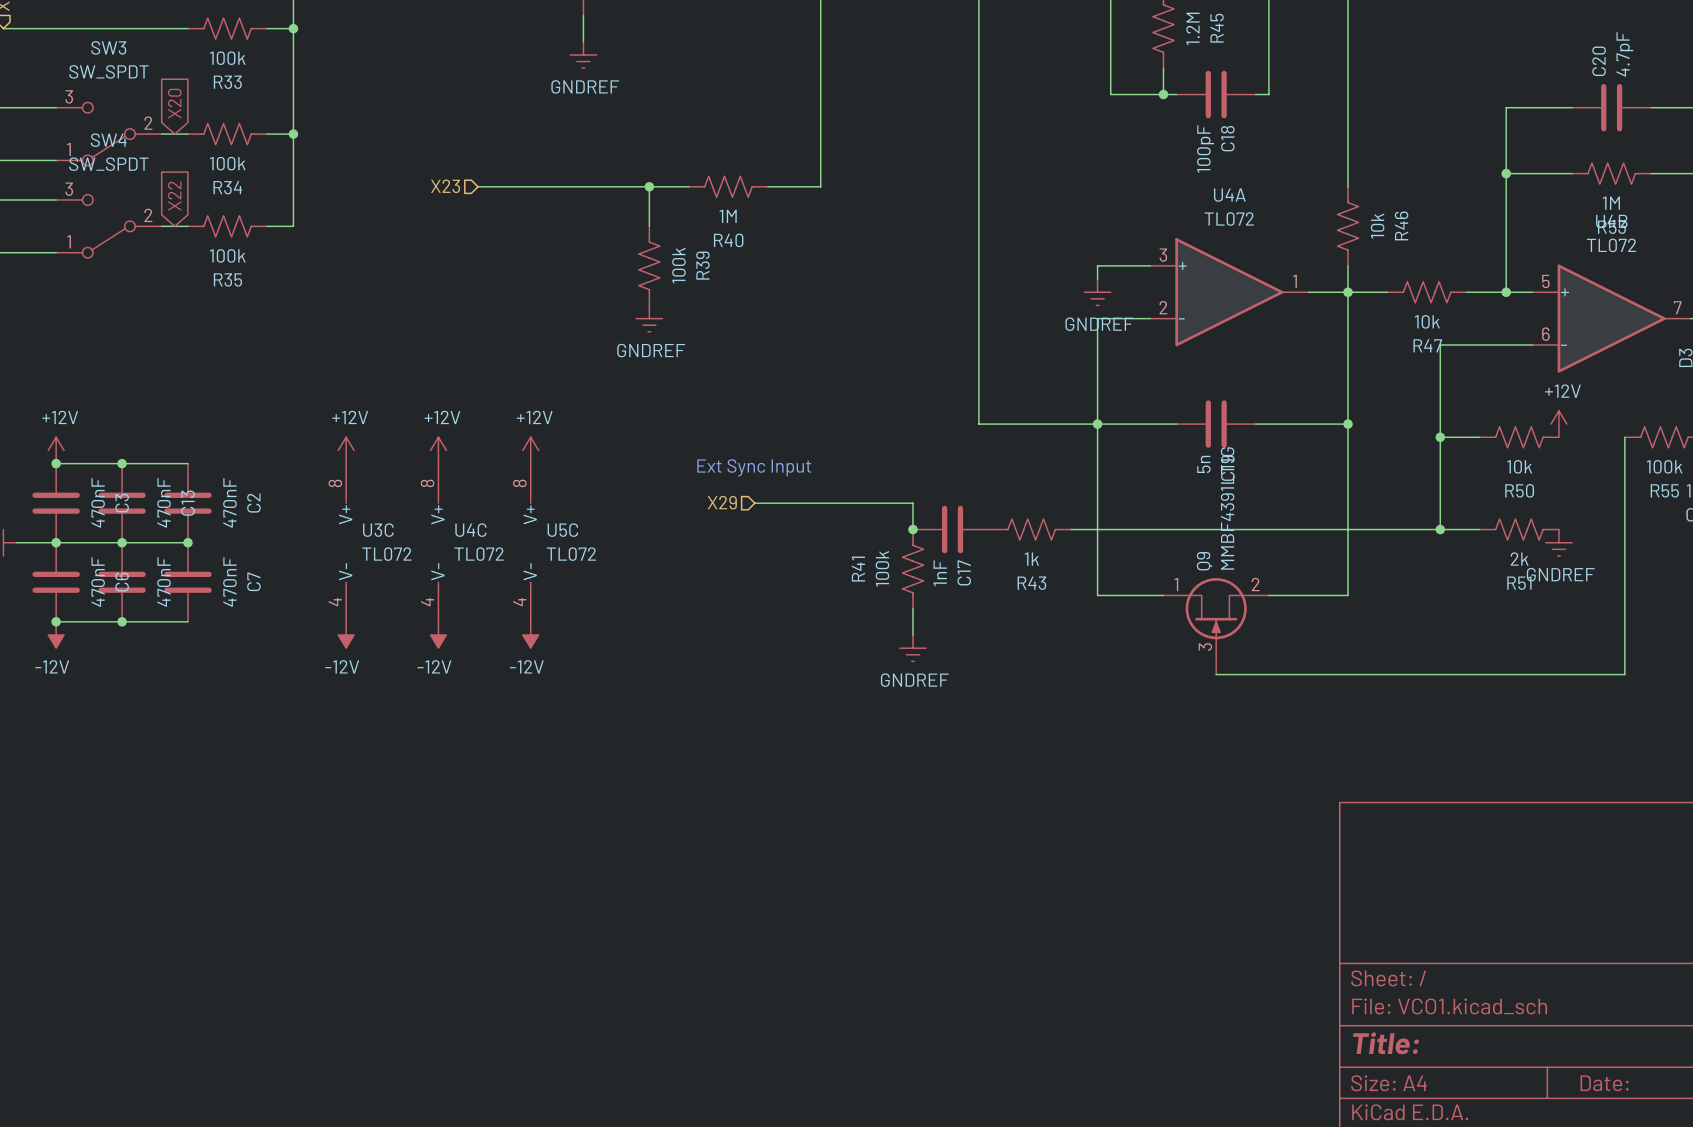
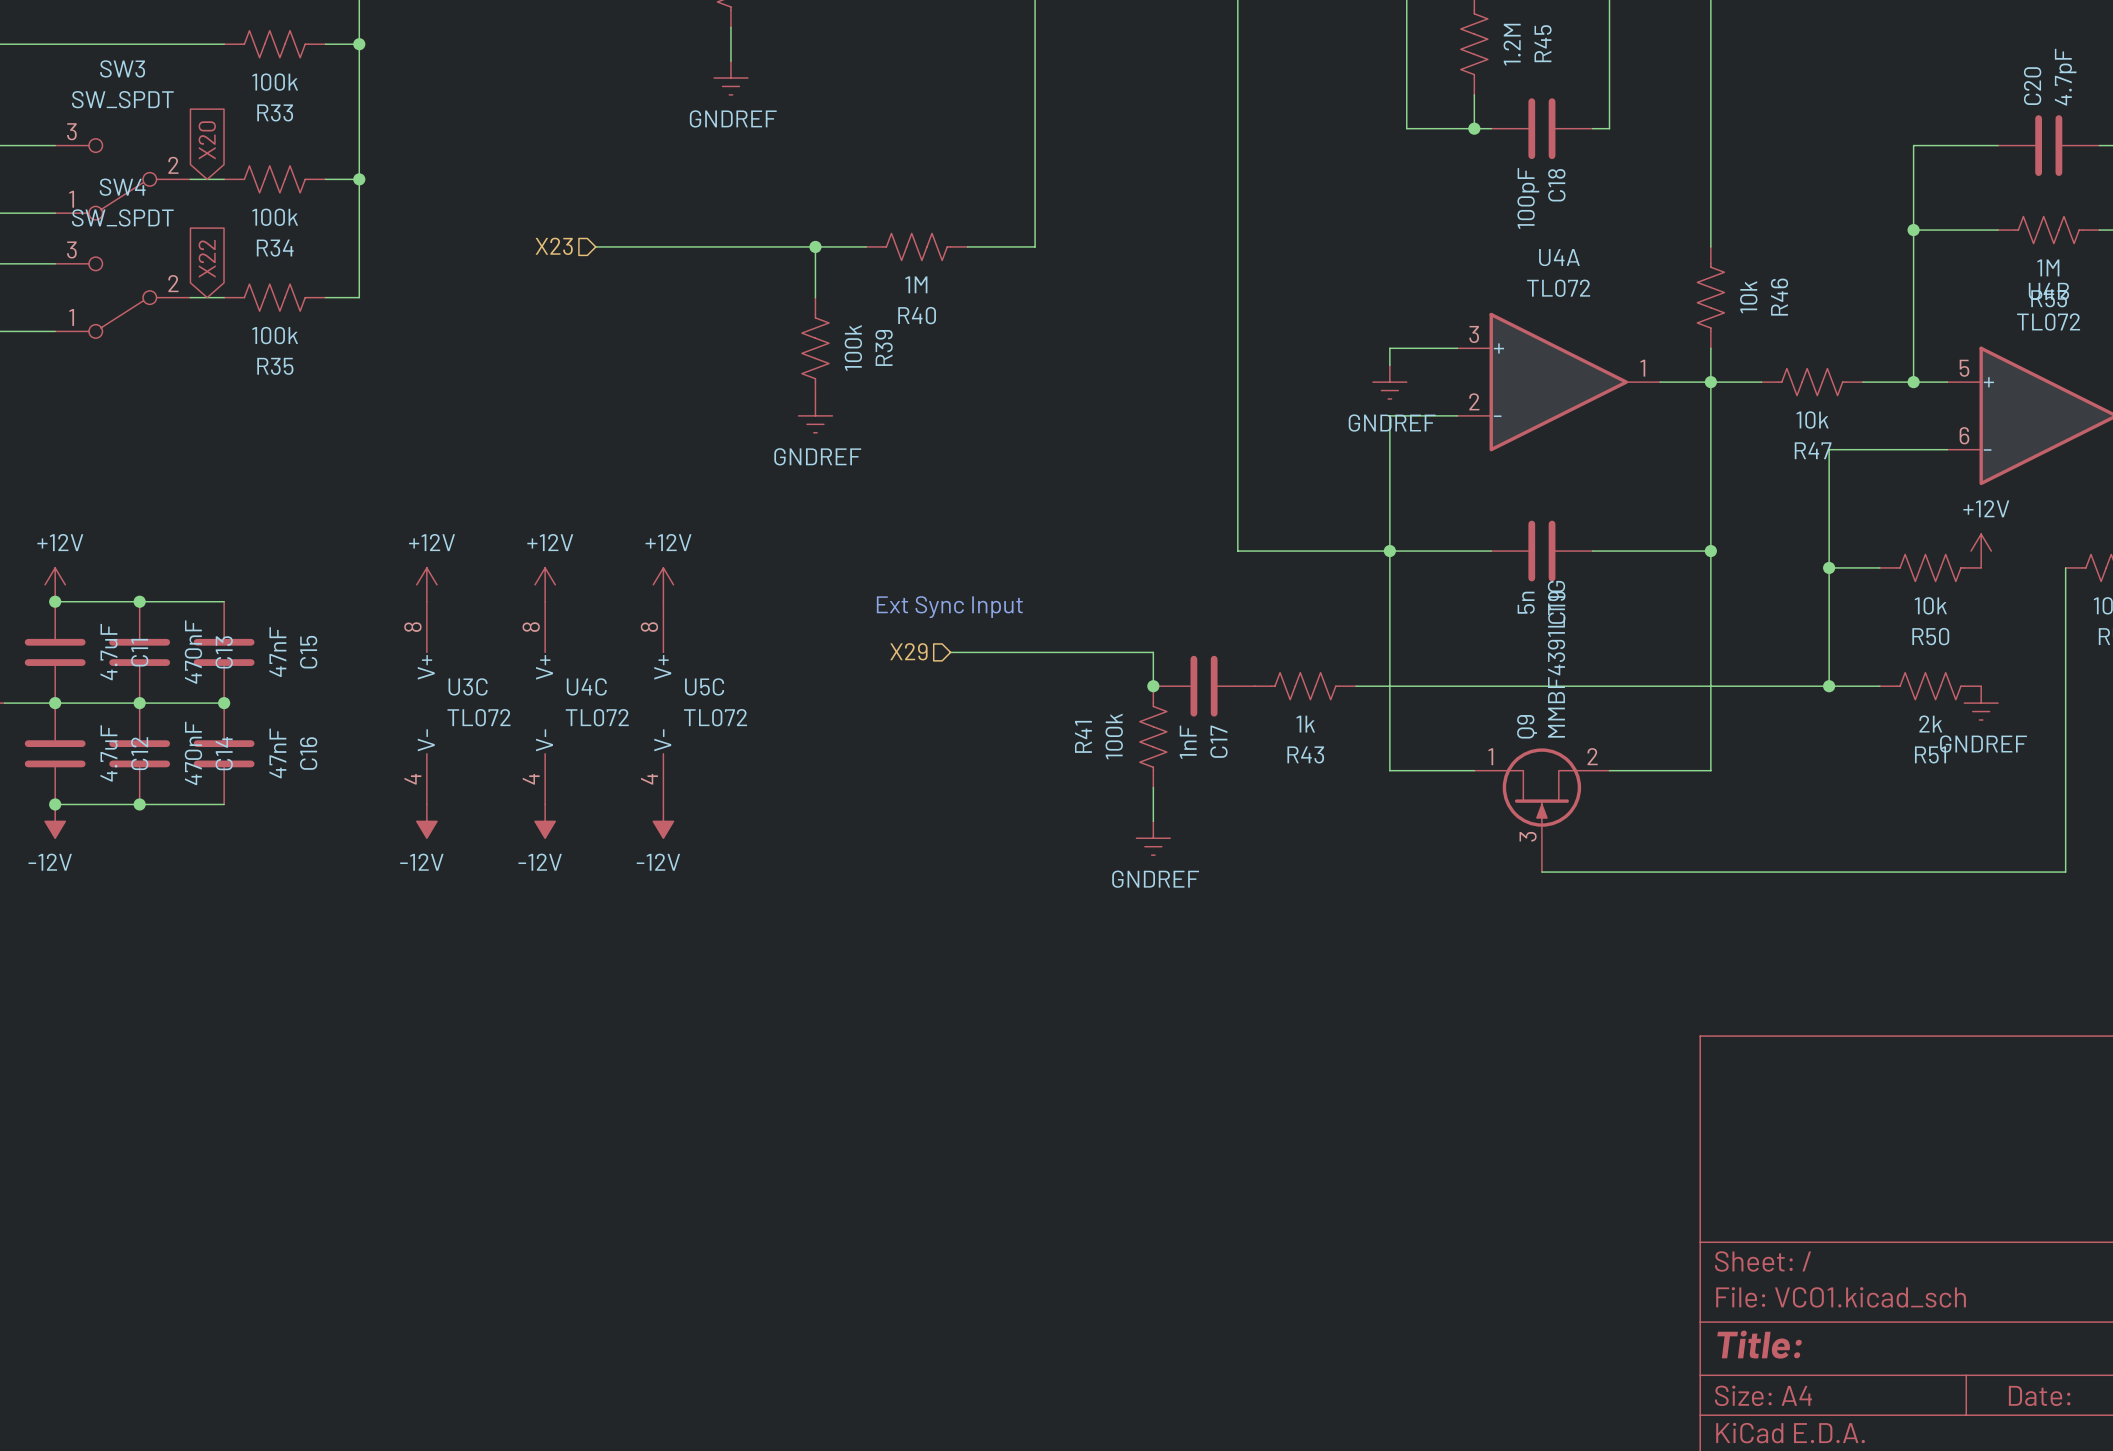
C3 value: 470nF (98, 502) -> 4.7uF (109, 652)
C2 value: 470nF (229, 502) -> 47nF (277, 652)
C3 name: C3 (122, 503) -> C11 (139, 652)
C2 name: C2 (253, 503) -> C15 (308, 652)
C7 name: C7 (253, 581) -> C16 (308, 753)
C6 value: 470nF (98, 582) -> 4.7uF (109, 753)
C6 name: C6 (122, 582) -> C12 (139, 753)
C14 name: none -> C14 (224, 753)
C7 value: 470nF (229, 582) -> 47nF (277, 753)

